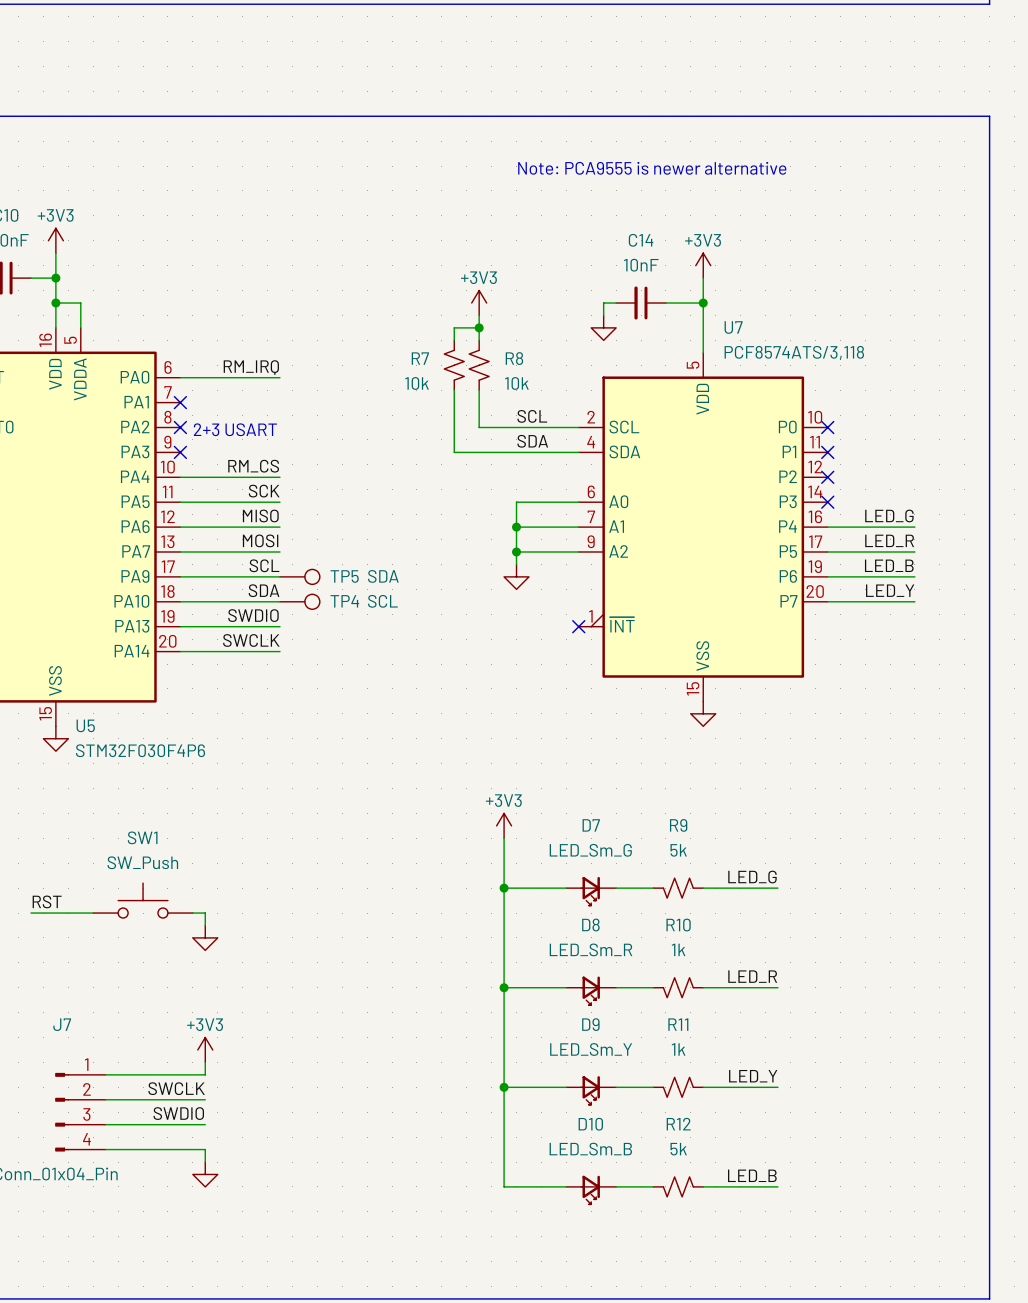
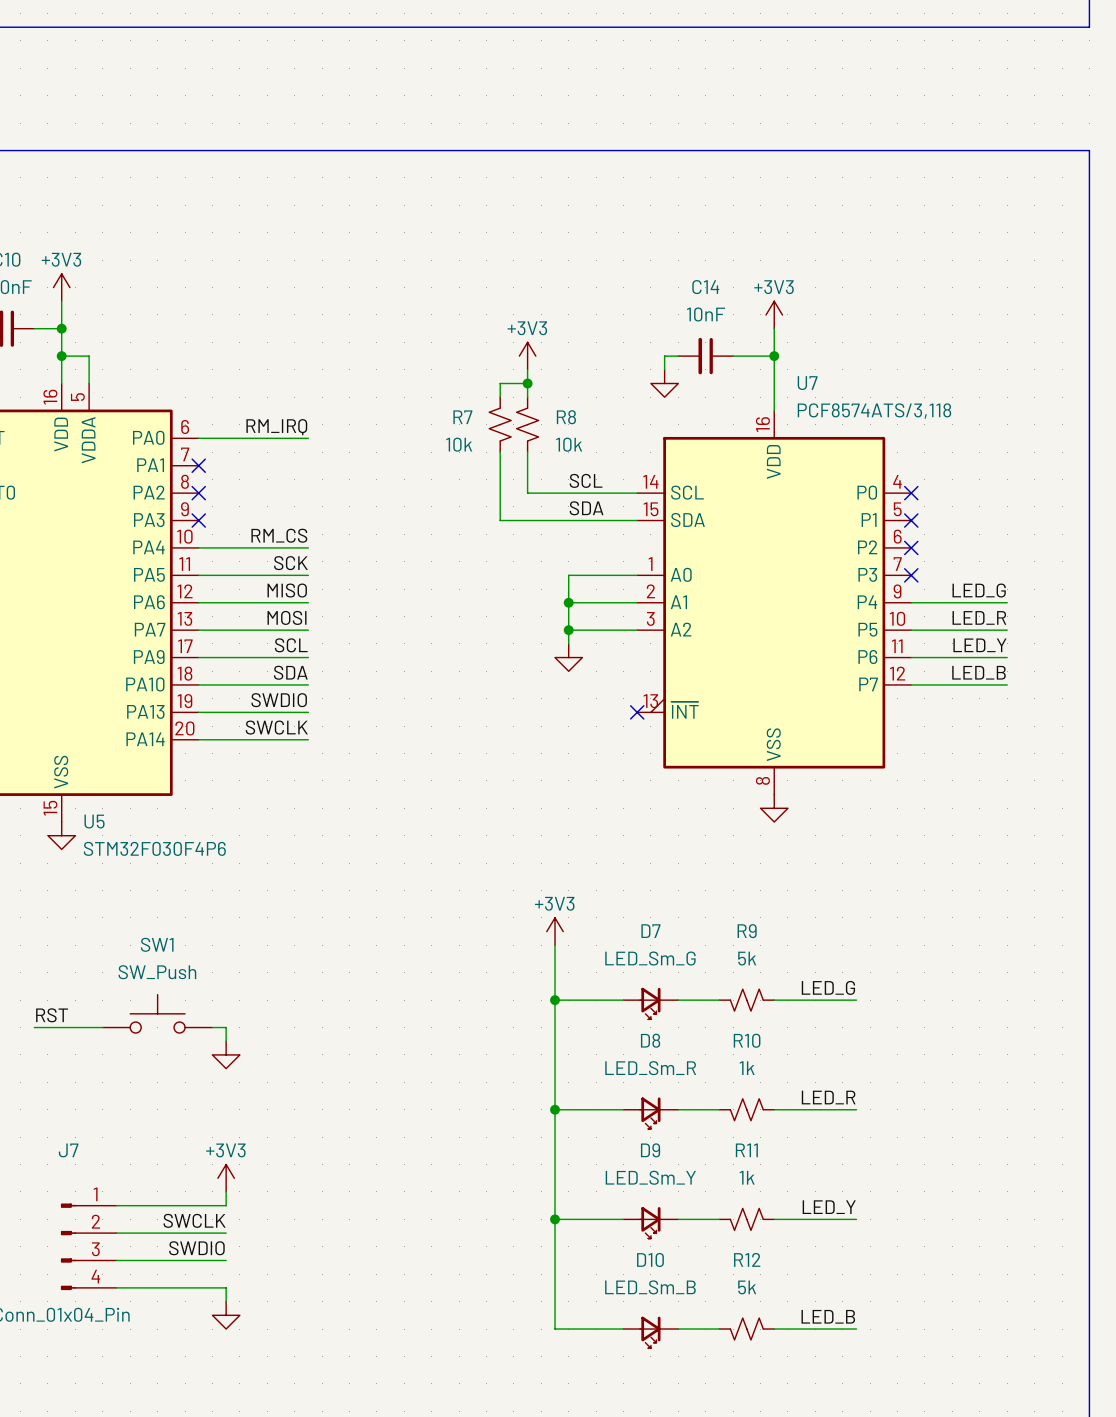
text: Note: PCA9555 is newer alternative (652, 168) -> none
U7 symbol: [578, 352, 828, 702] -> [637, 410, 912, 795]
text: 2+3 USART (235, 429) -> none
label: LED_B (889, 565) -> LED_Y (979, 645)
TP5: SDA (299, 576) -> none
label: LED_Y (890, 590) -> LED_B (979, 672)
TP4: SCL (299, 601) -> none

